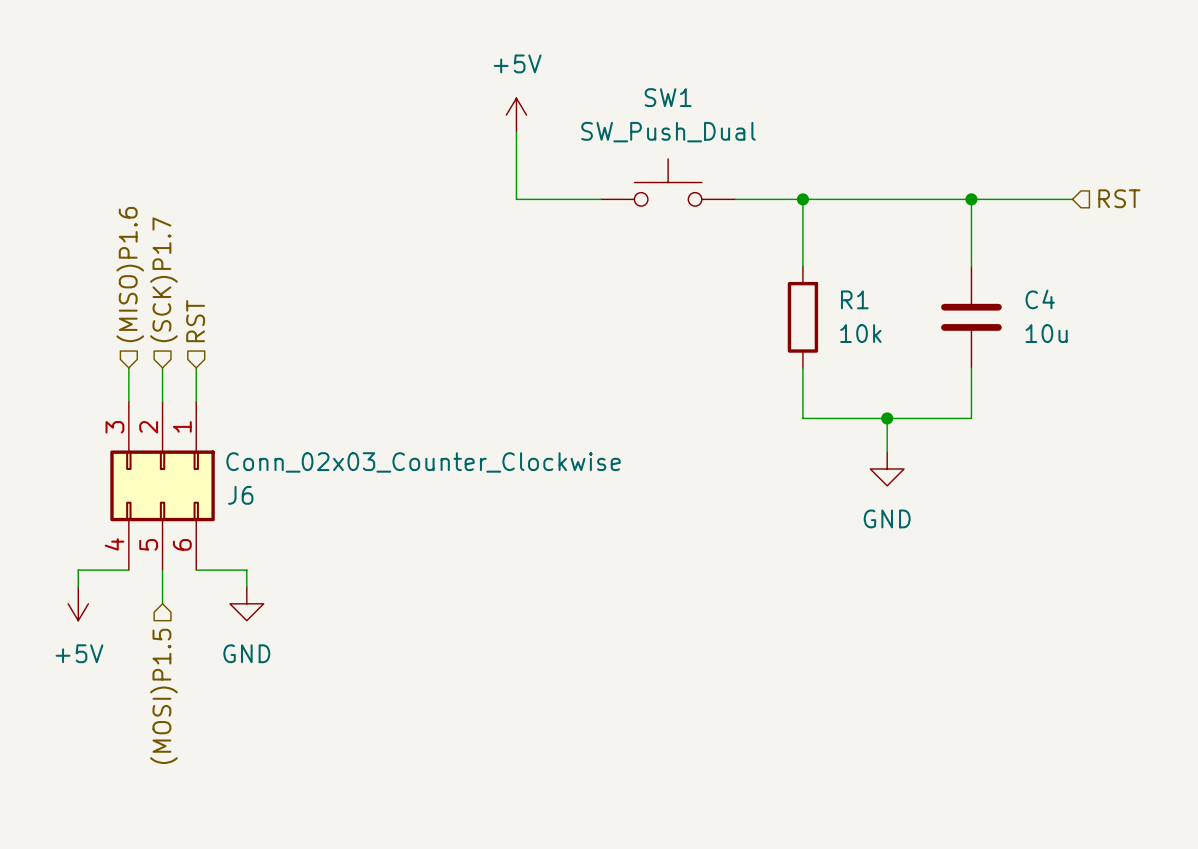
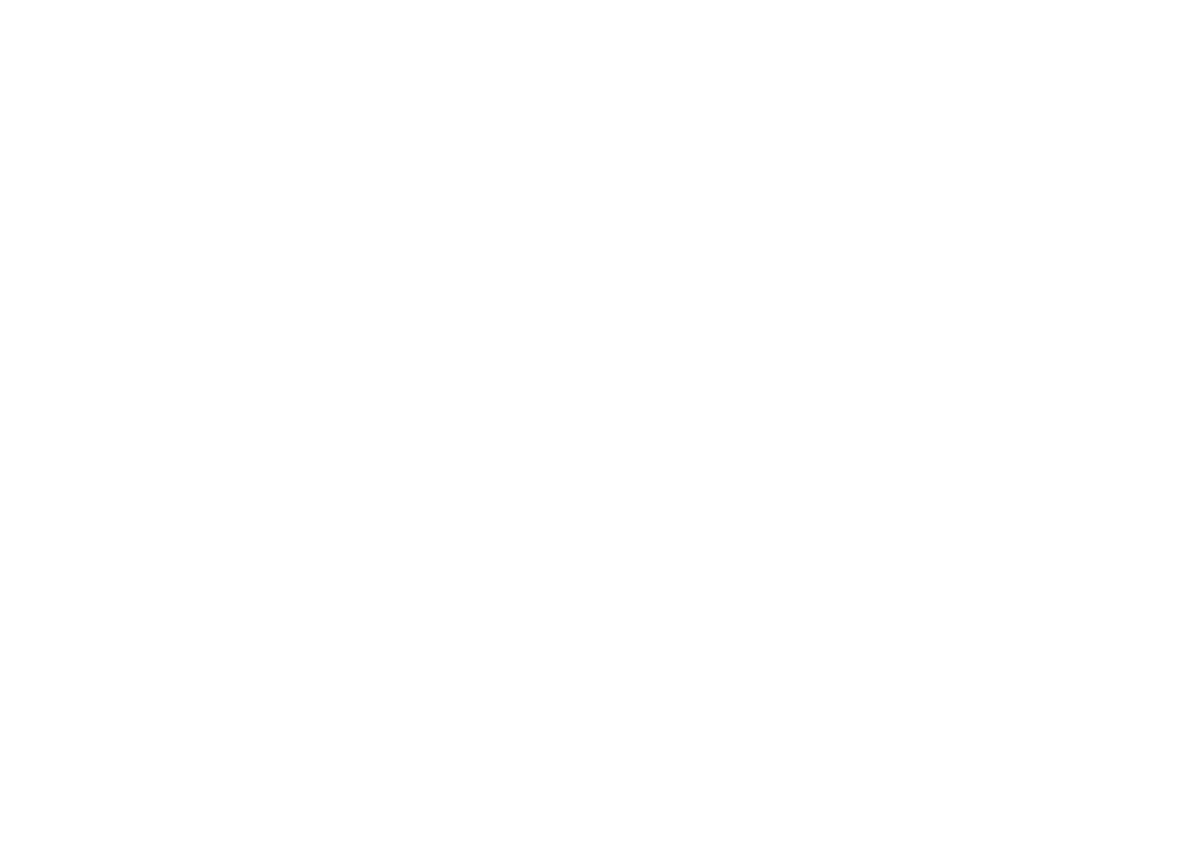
power symbol: +5V (516, 115) -> none
wire: (516, 131) (516, 199) (600, 199) -> none
SW1: SW_Push_Dual (668, 182) -> none
hierarchical label: RST (1119, 198) -> none
wire: (735, 199) (1072, 199) -> none
wire: (802, 199) (802, 266) -> none
junction: (802, 199) -> none
wire: (971, 199) (971, 266) -> none
junction: (971, 199) -> none
hierarchical label: (MISO)P1.6 (130, 274) -> none
hierarchical label: (SCK)P1.7 (163, 279) -> none
R1: 10k (802, 317) -> none
C4: 10u (971, 317) -> none
hierarchical label: RST (195, 321) -> none
wire: (128, 367) (128, 401) -> none
wire: (162, 367) (162, 401) -> none
wire: (196, 367) (196, 401) -> none
wire: (802, 367) (802, 418) (971, 418) (971, 367) -> none
wire: (887, 418) (887, 452) -> none
junction: (887, 418) -> none
power symbol: GND (887, 469) -> none
J6: Conn_02x03_Counter_Clockwise (162, 485) -> none
wire: (128, 570) (78, 570) (78, 586) -> none
wire: (162, 570) (162, 603) -> none
wire: (196, 570) (246, 570) (246, 586) -> none
power symbol: +5V (78, 603) -> none
power symbol: GND (246, 603) -> none
hierarchical label: (MOSI)P1.5 (163, 696) -> none

